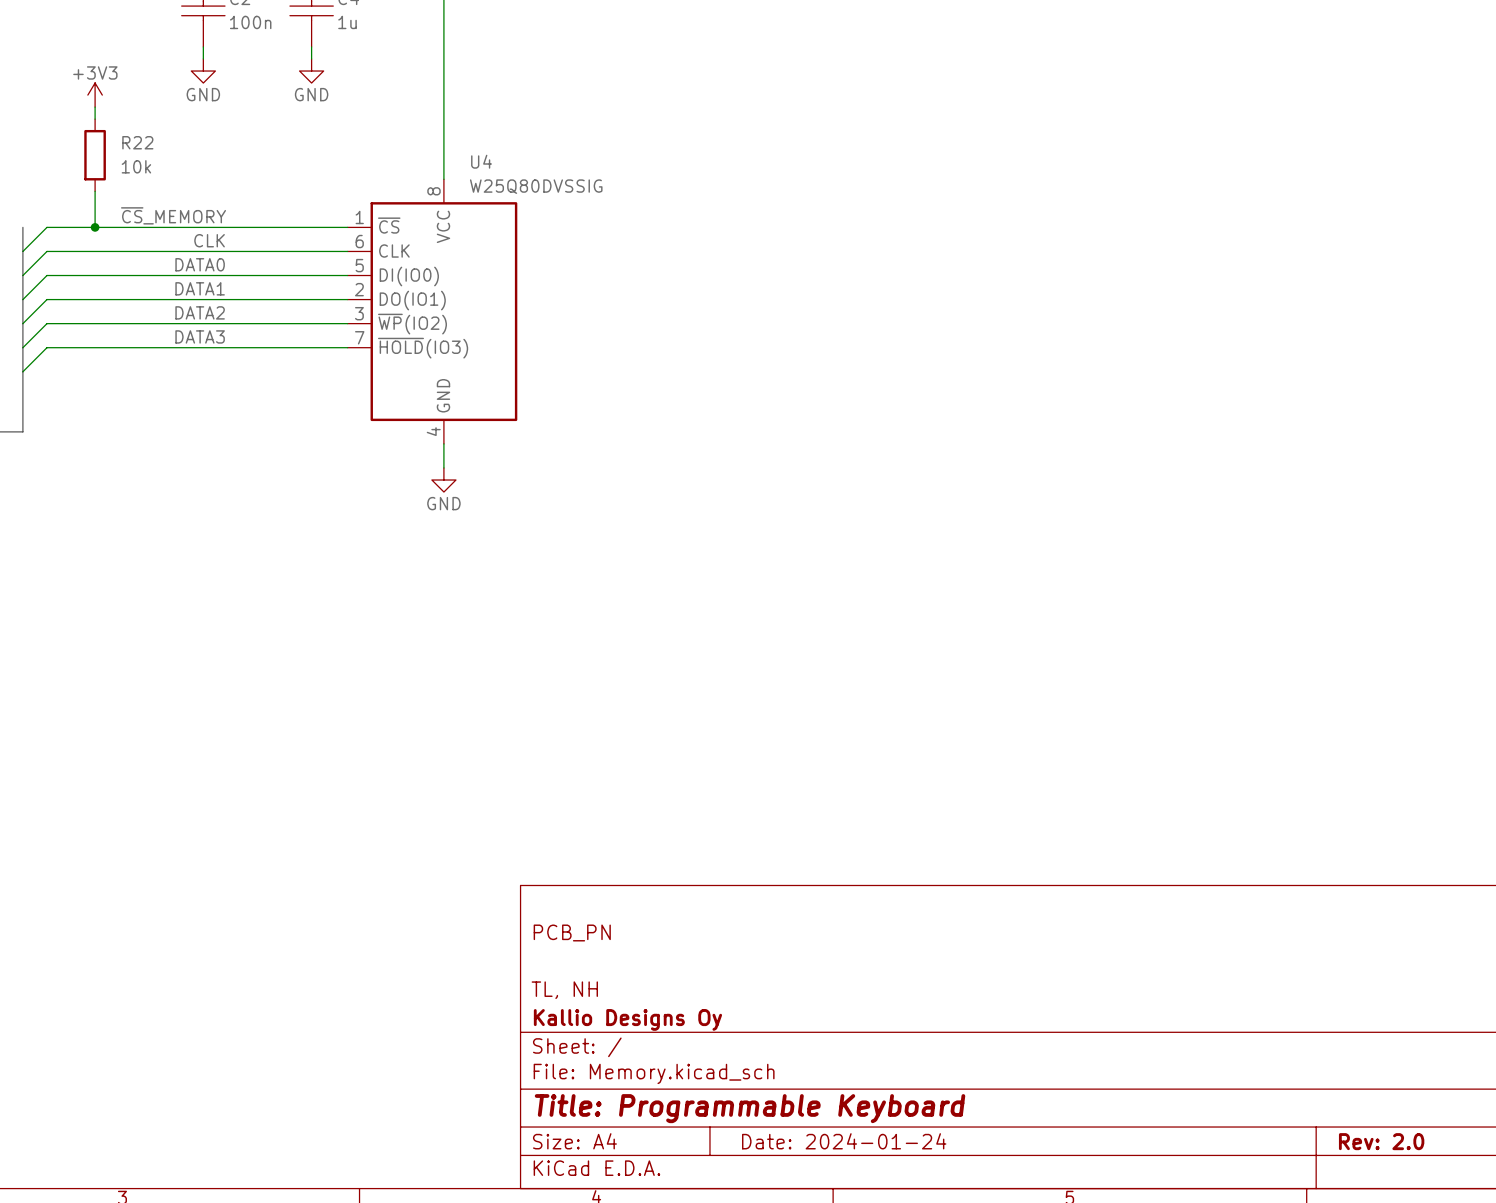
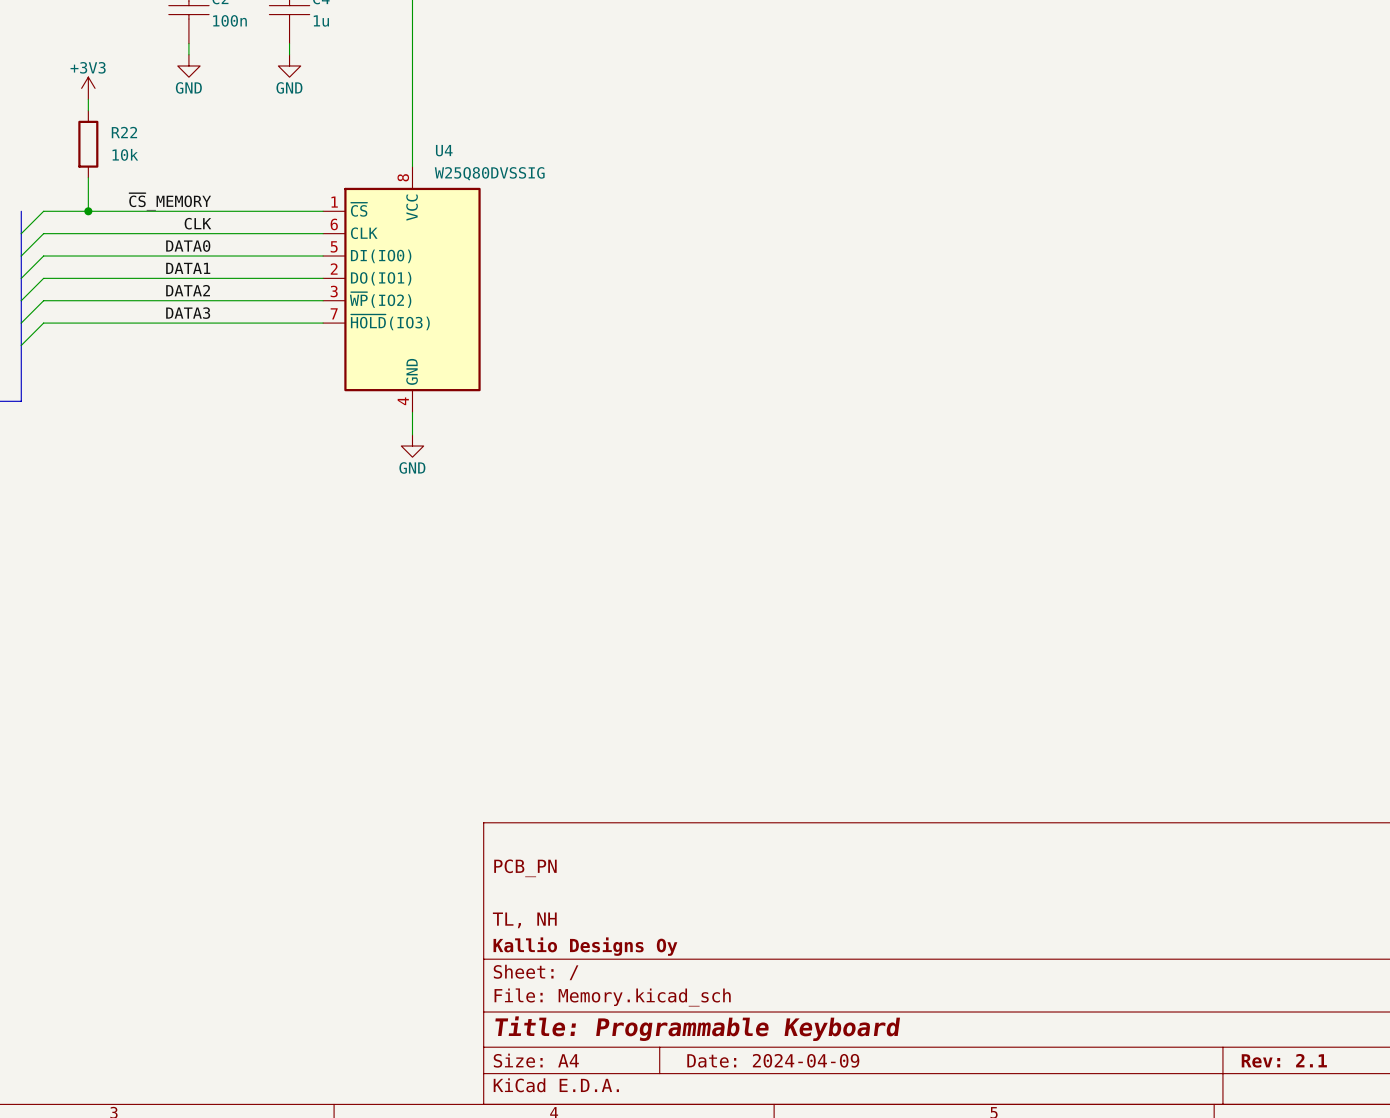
title block: Date: 2024-01-24 (844, 1141) -> Date: 2024-04-09 (773, 1060)
title block: Rev: 2.0 (1381, 1141) -> Rev: 2.1 (1284, 1060)

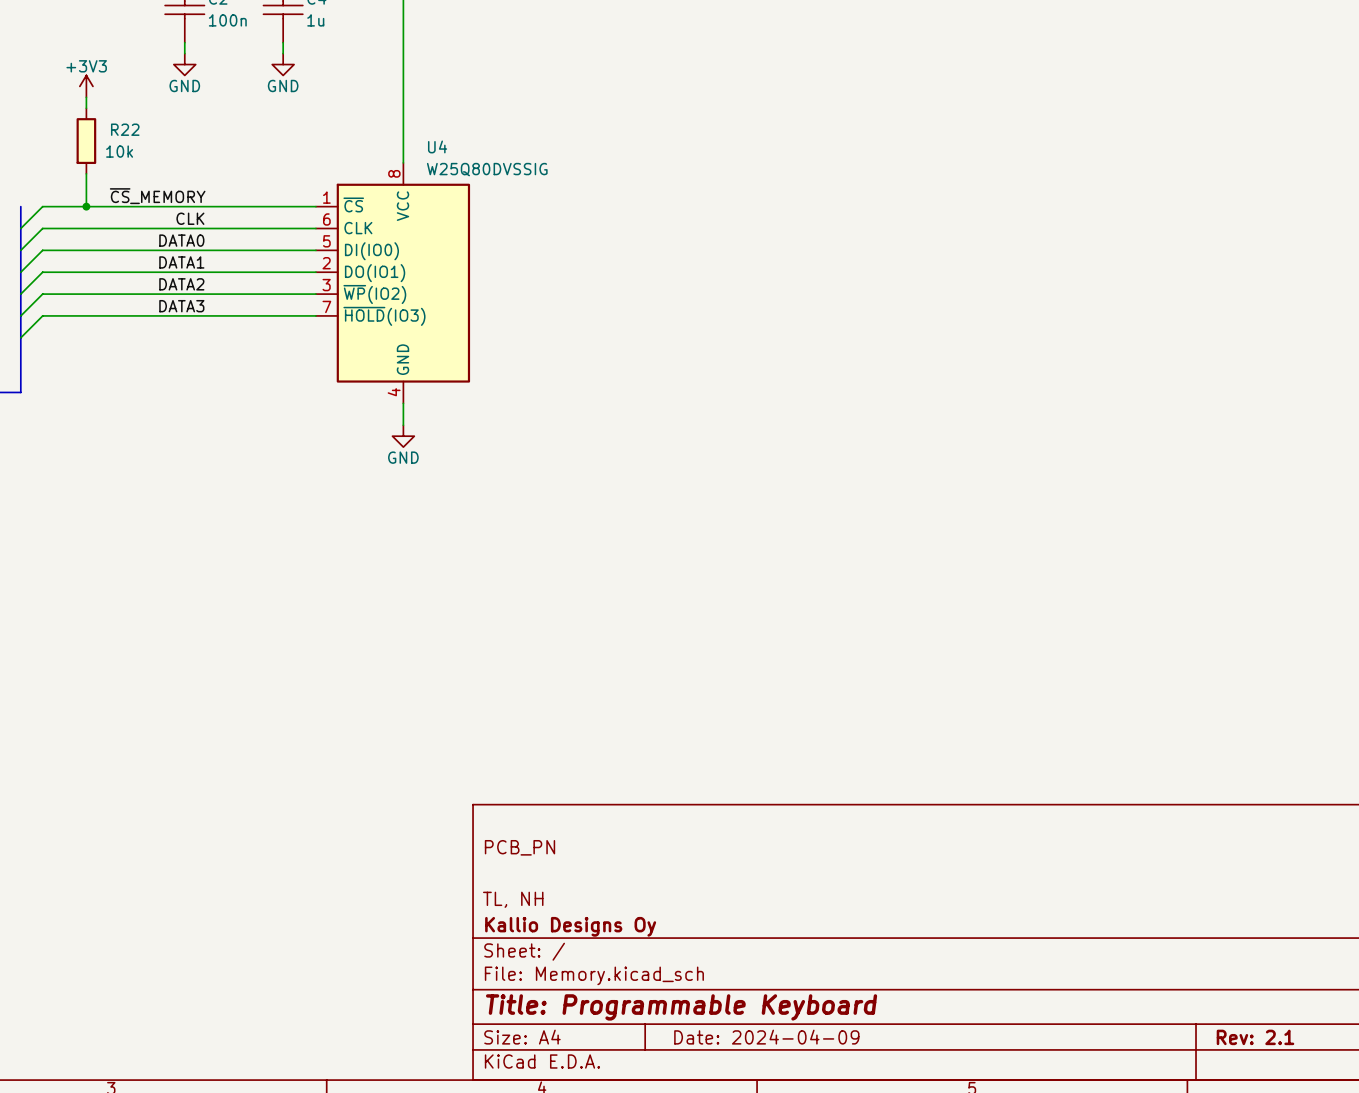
R22 symbol: [78, 110, 99, 178] -> [76, 108, 97, 174]
R22 value: none -> 10k (119, 151)
R22 text: 10k (125, 154) -> none

